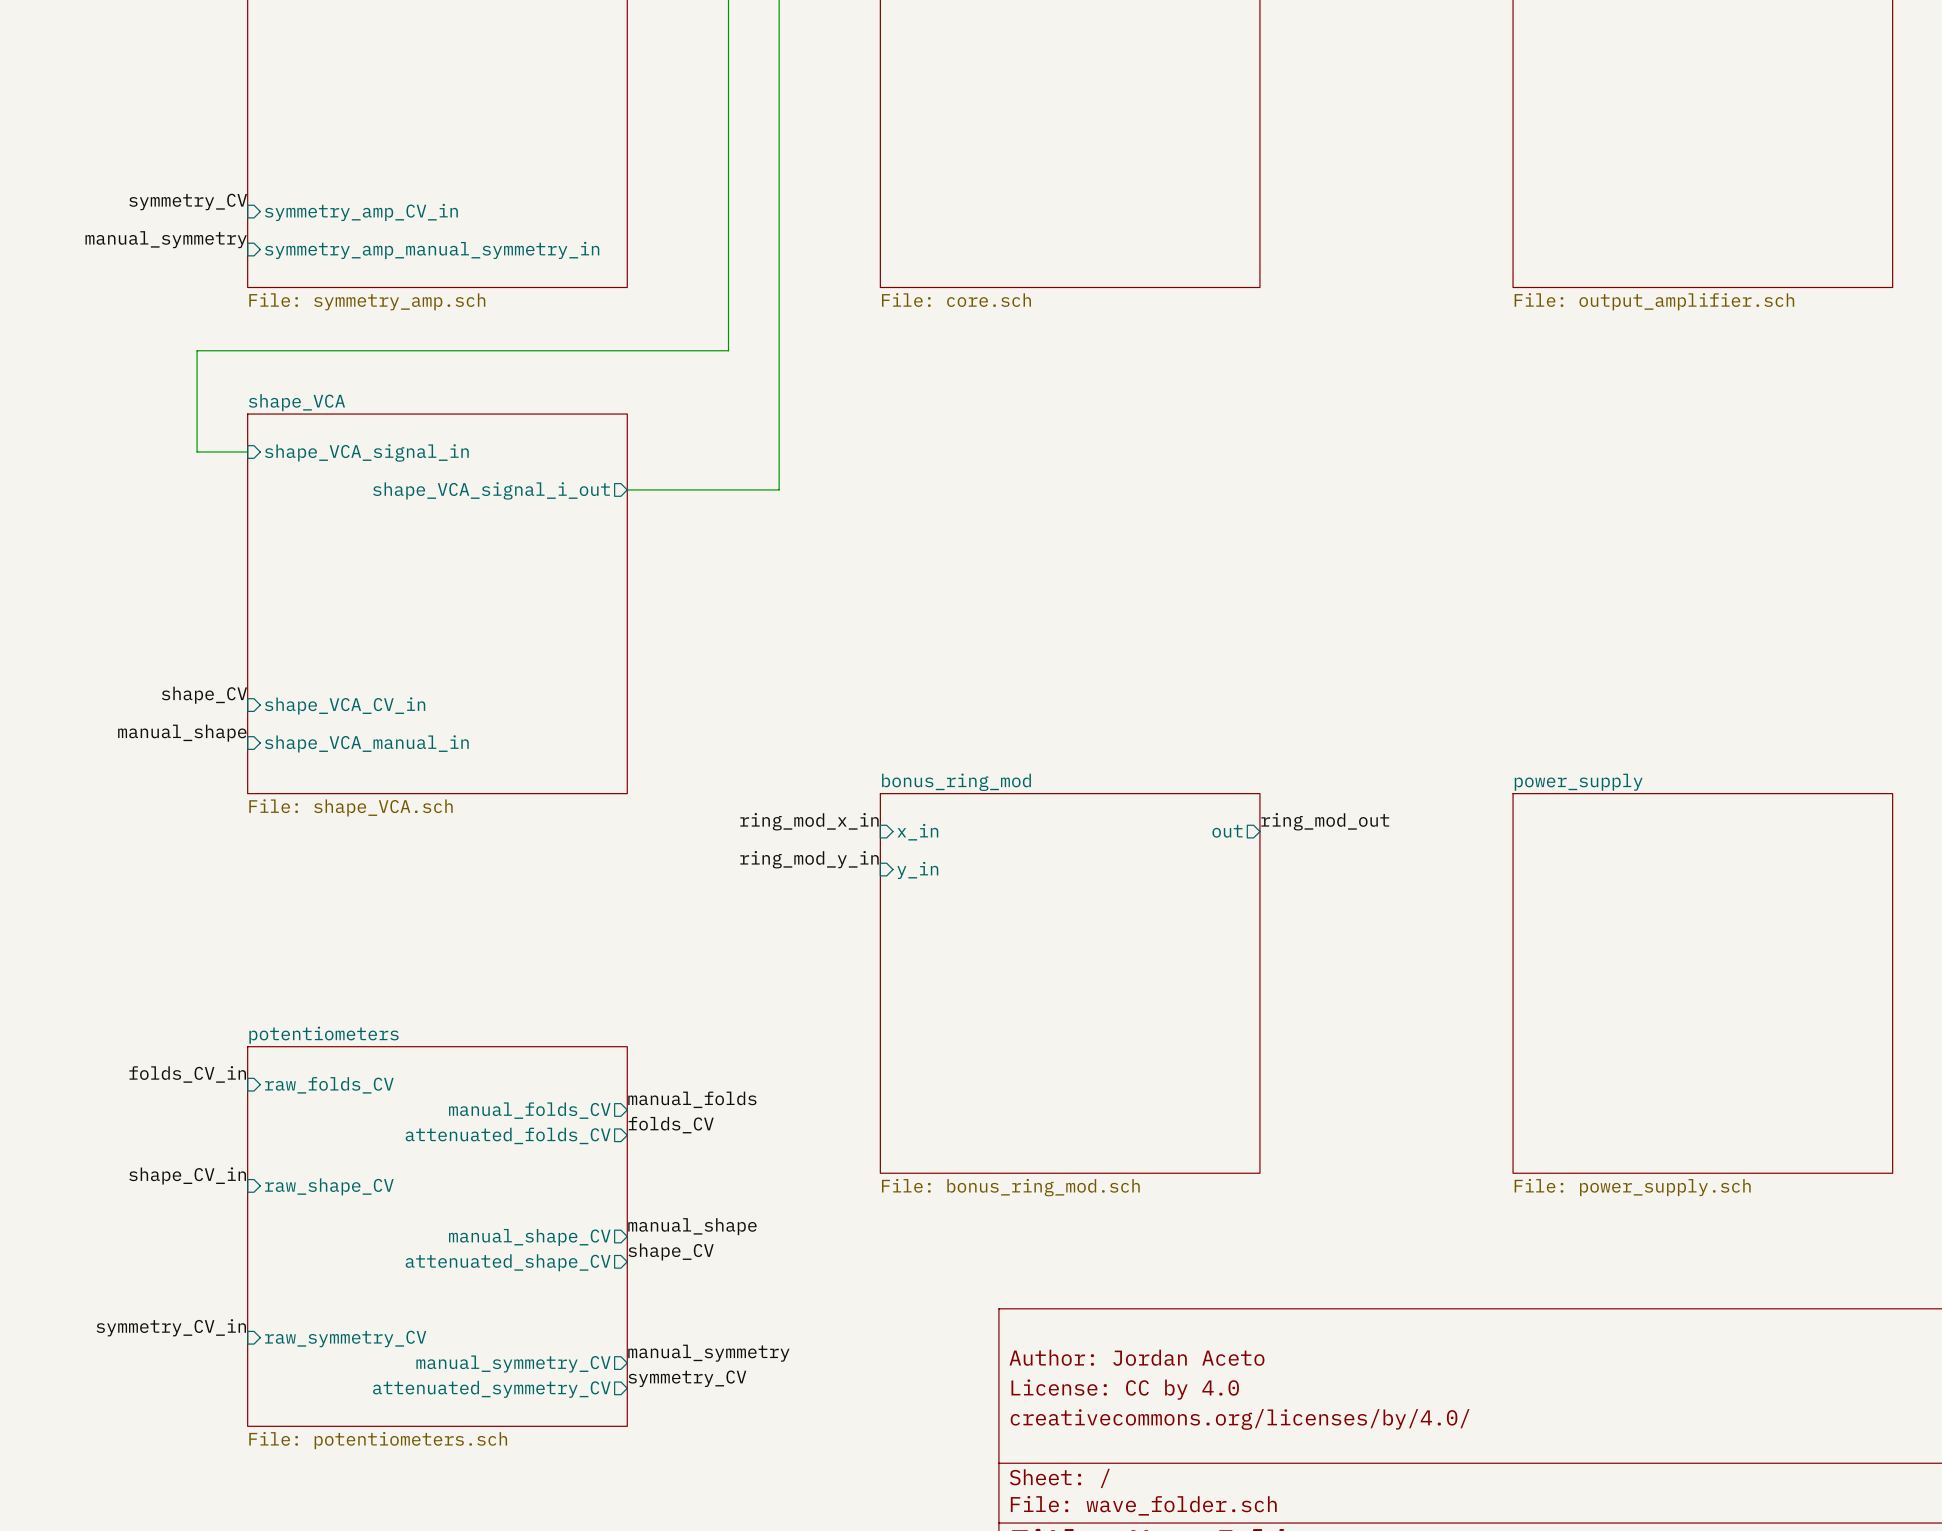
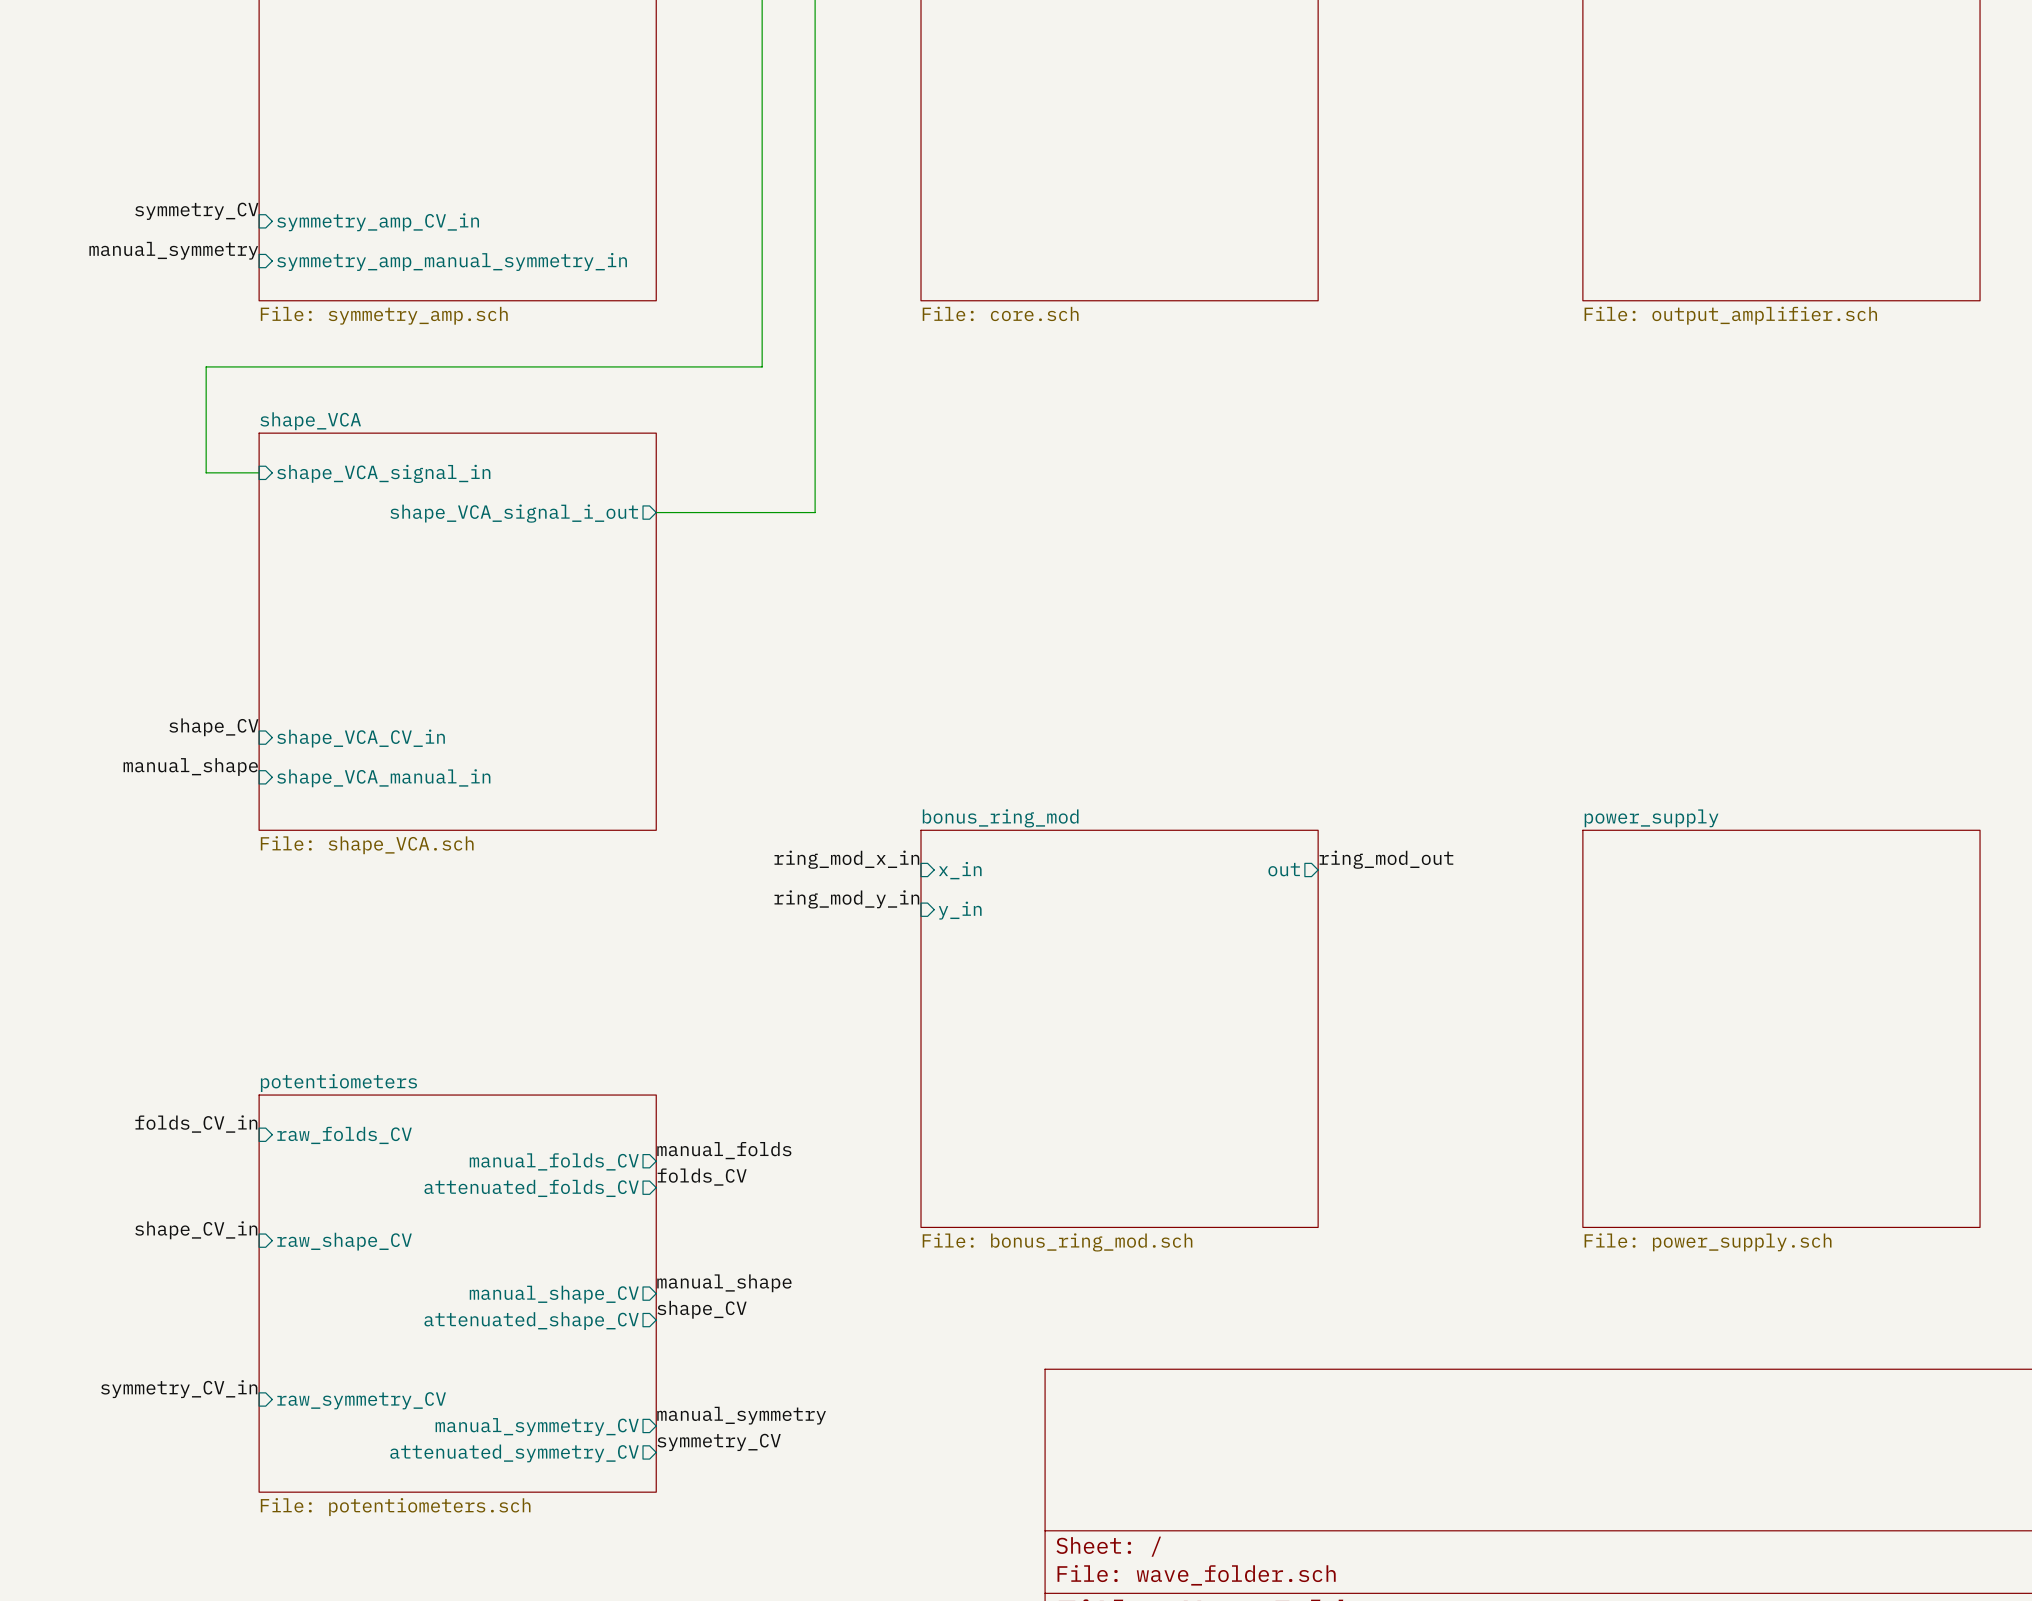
title block: Author: Jordan Aceto (1137, 1357) -> none
title block: License: CC by 4.0 (1125, 1389) -> none
title block: creativecommons.org/licenses/by/4.0/ (1240, 1419) -> none

